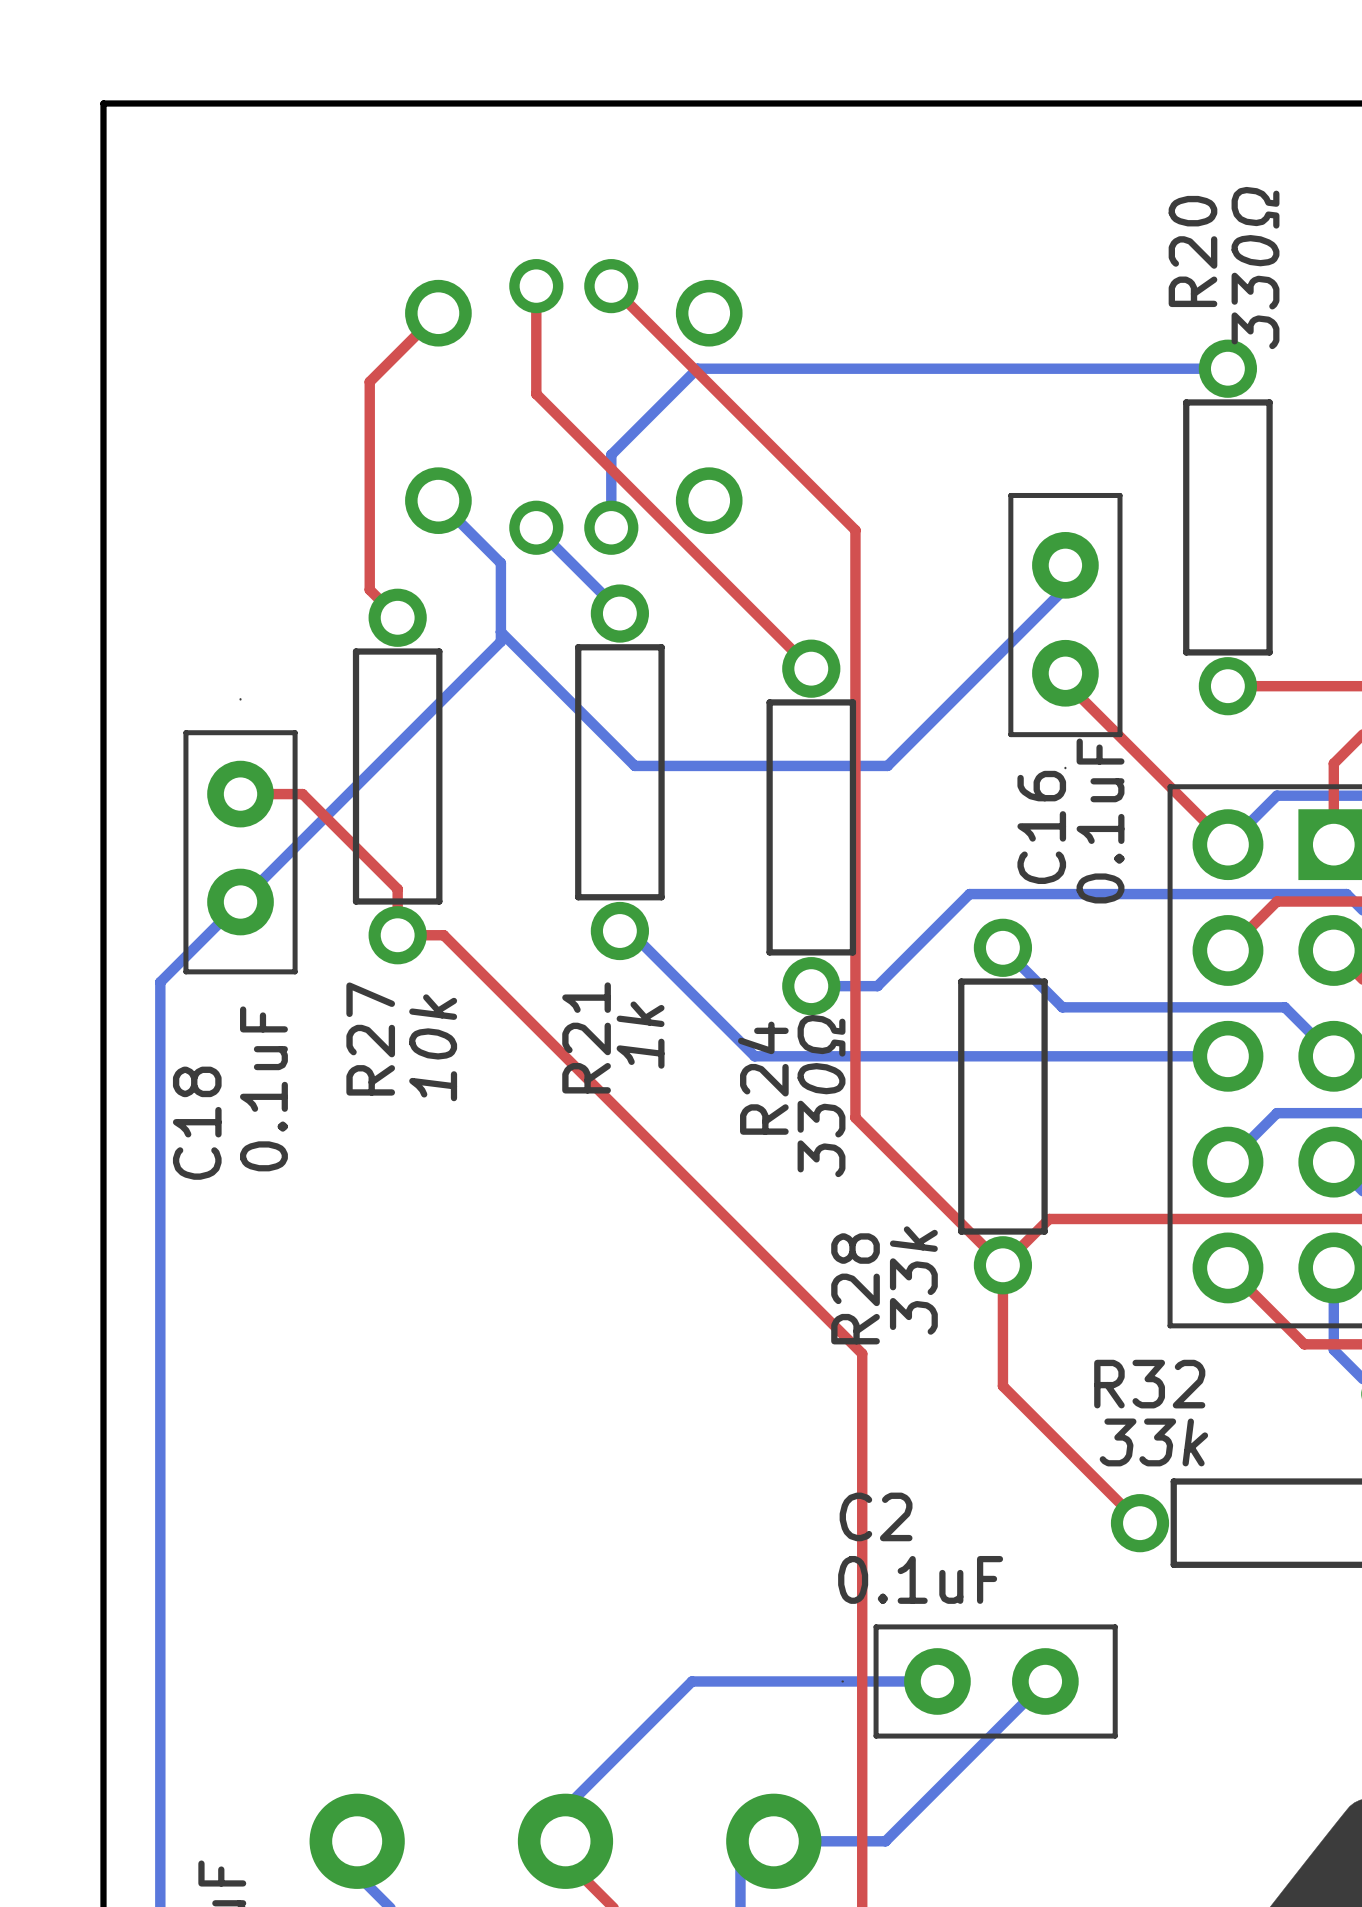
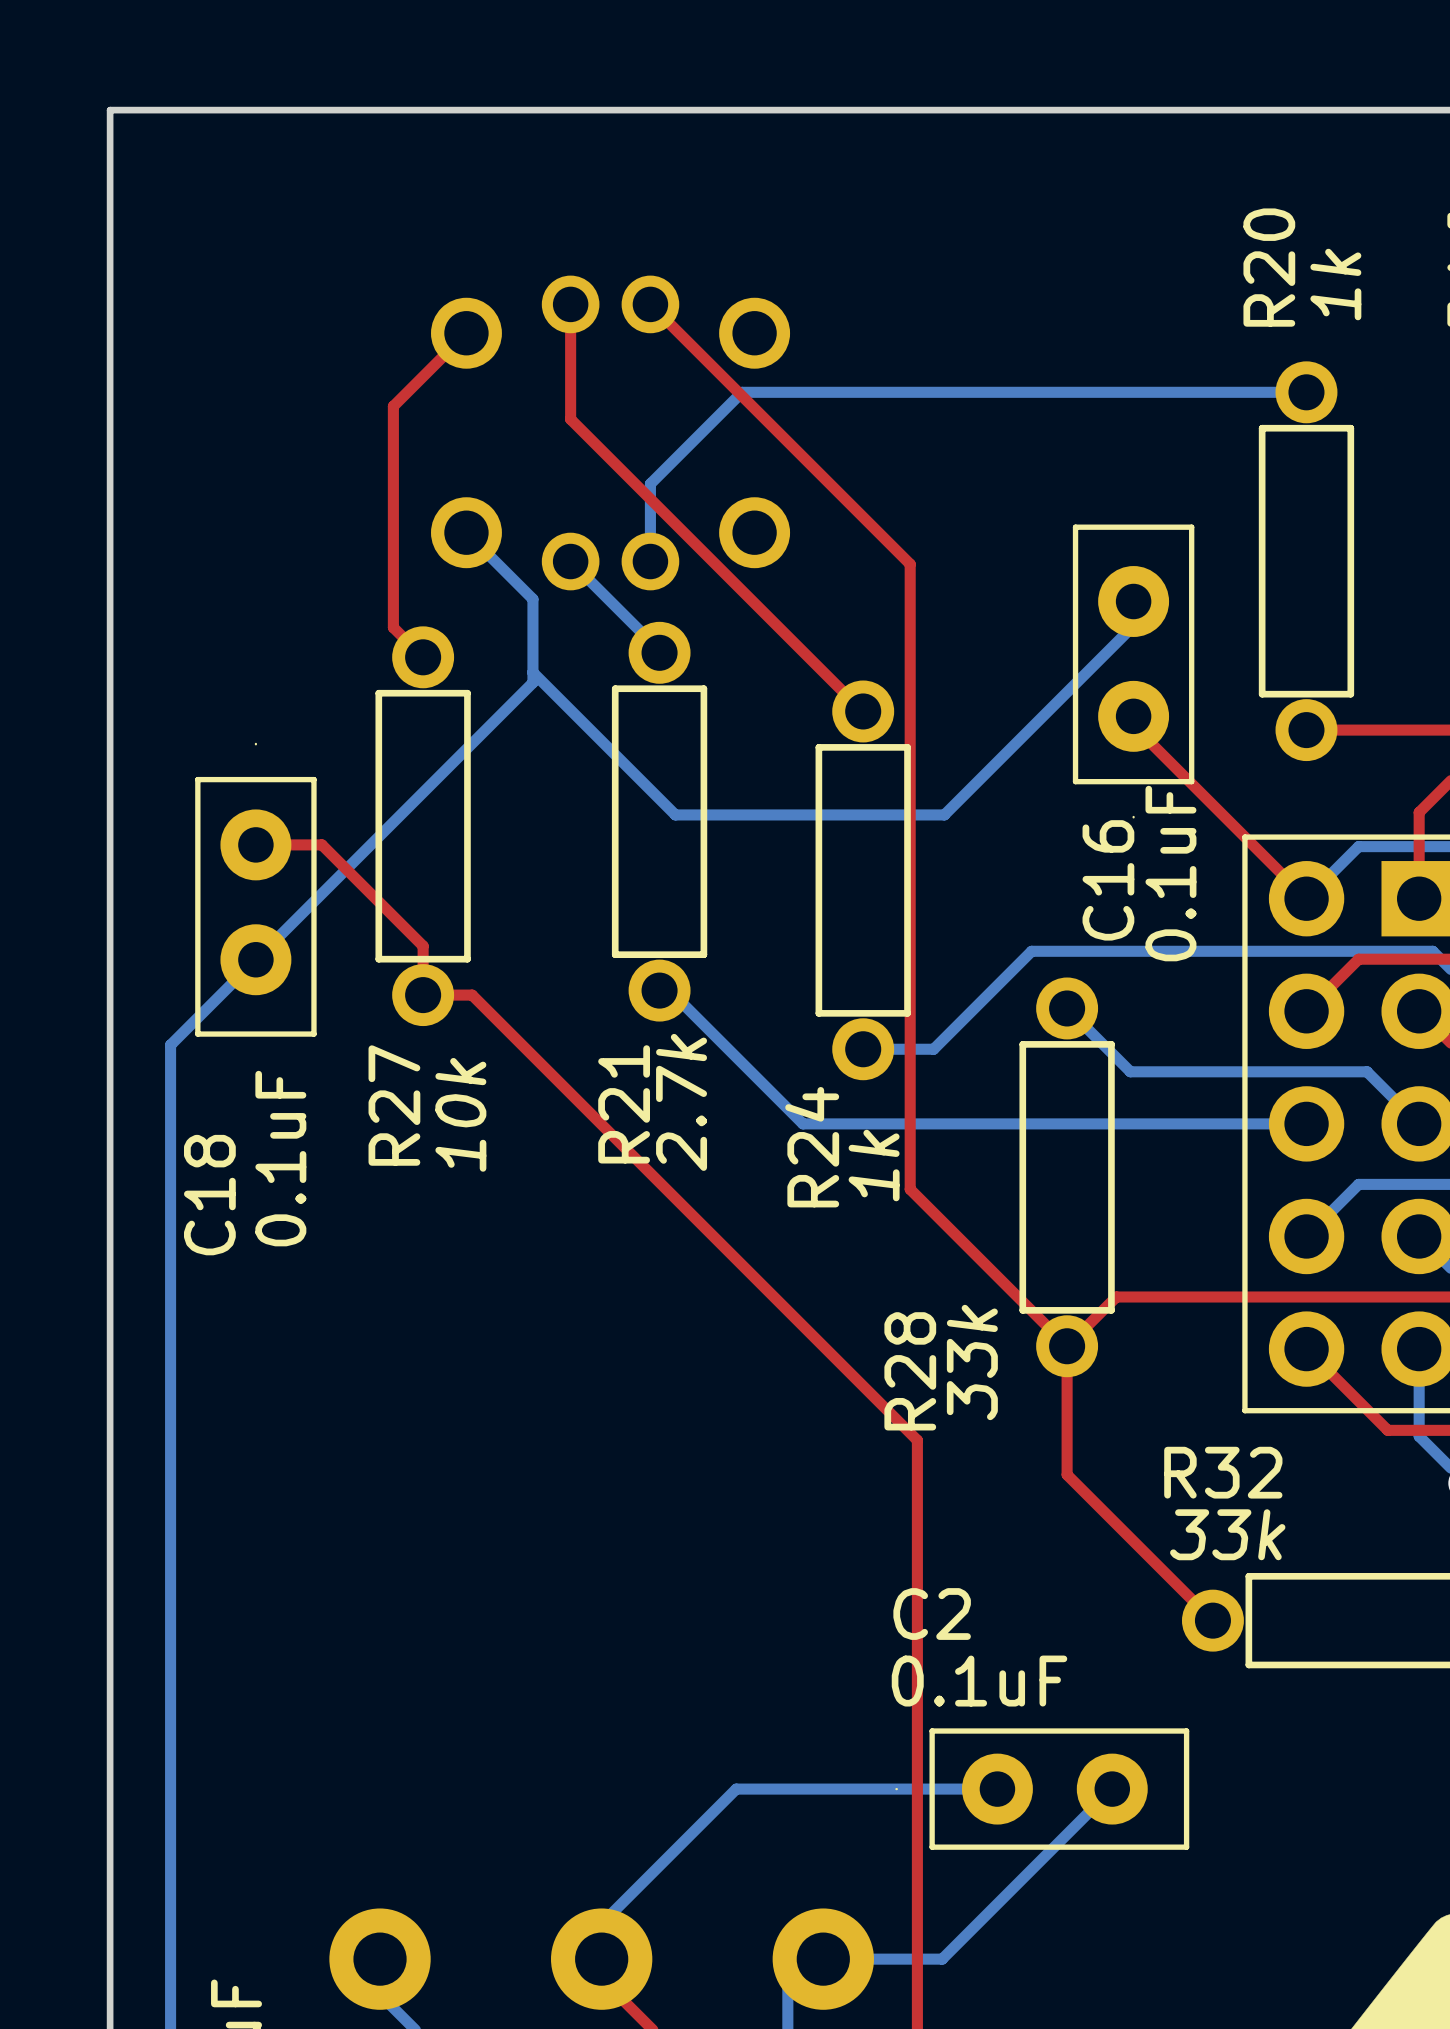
R20 text: 330Ω (1255, 268) -> 1k (1335, 284)
R21 text: 1k (640, 1035) -> 2.7k (681, 1102)
R24 text: 330Ω (821, 1096) -> 1k (874, 1165)

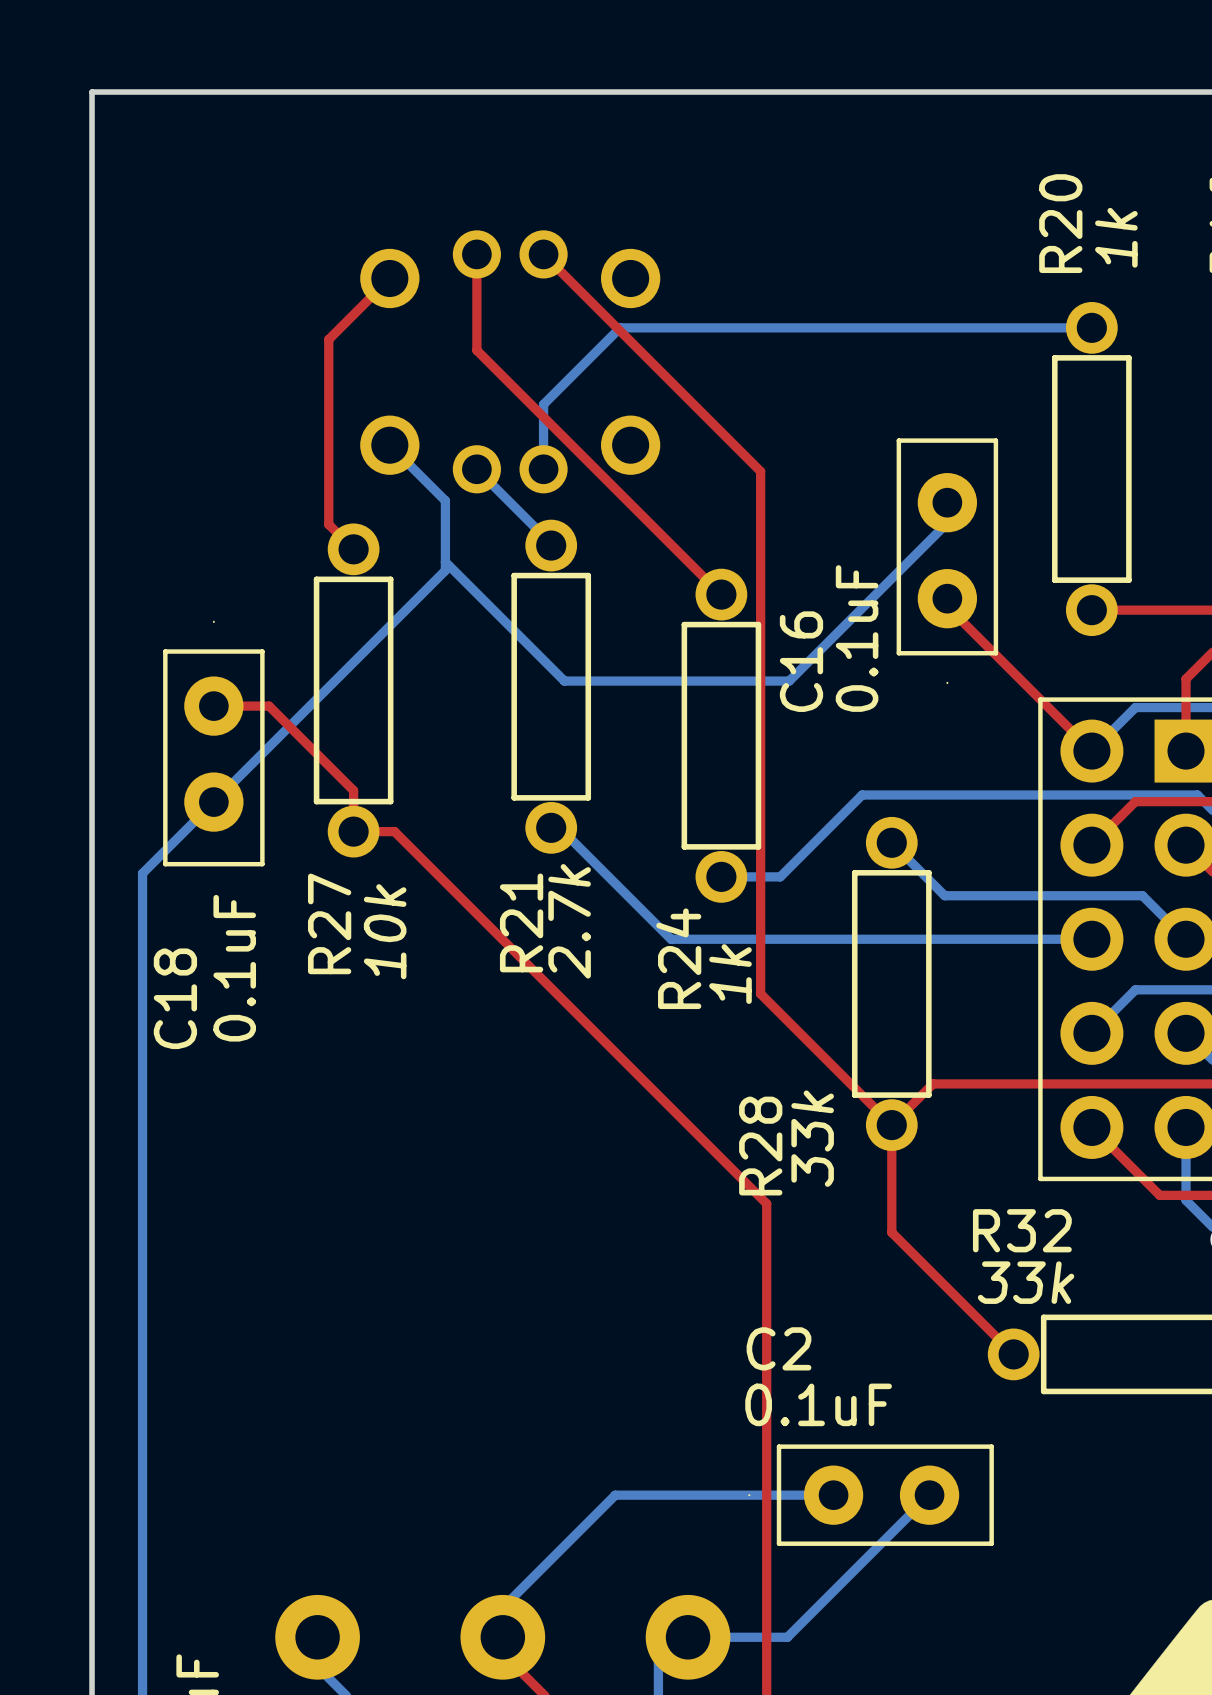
C16 text position: 0.1uF (1170, 873) -> 0.1uF (857, 638)
C16 name position: C16 (1108, 880) -> C16 (801, 661)

